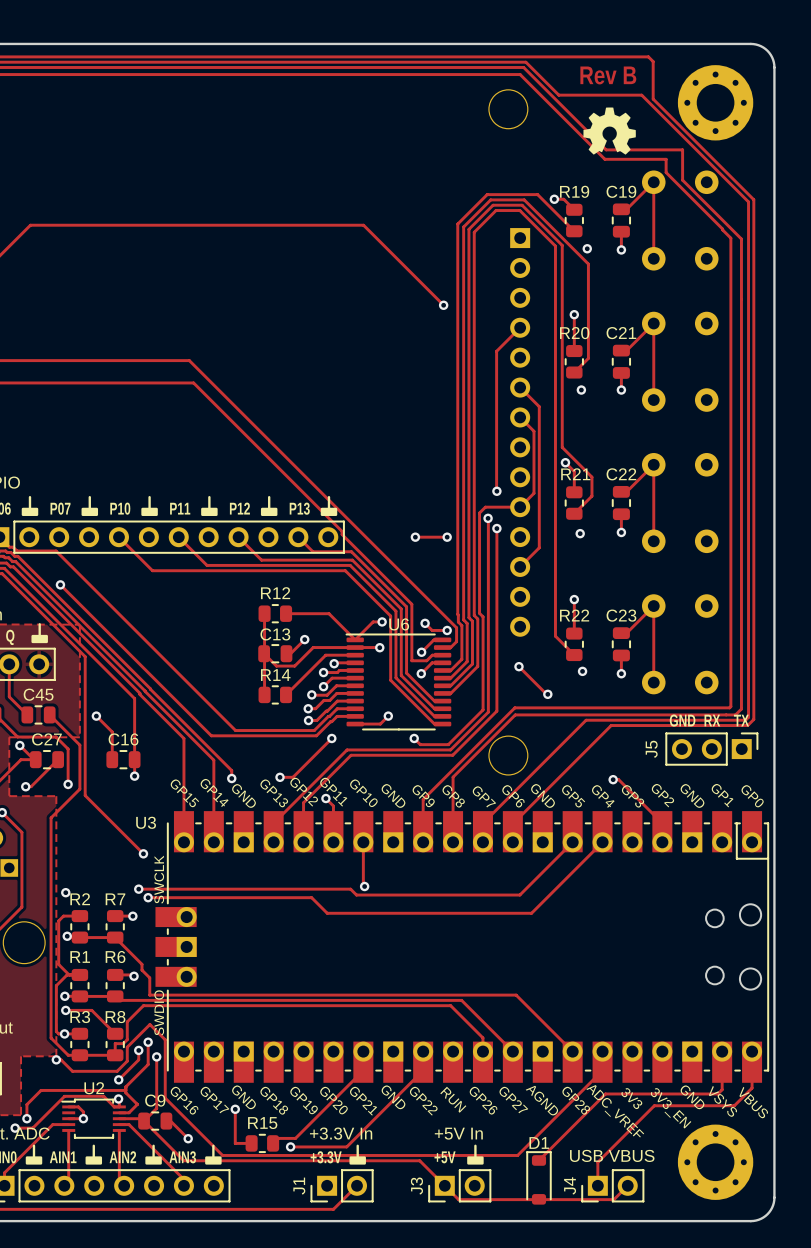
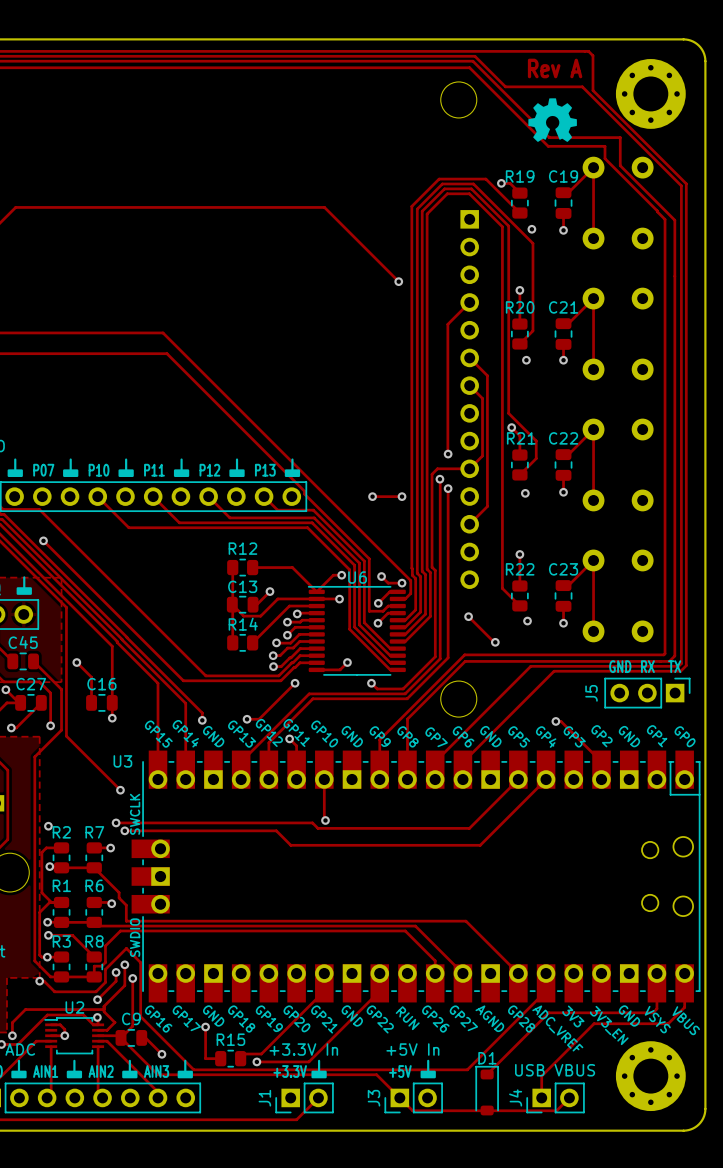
text: Rev B (608, 75) -> Rev A (555, 68)

